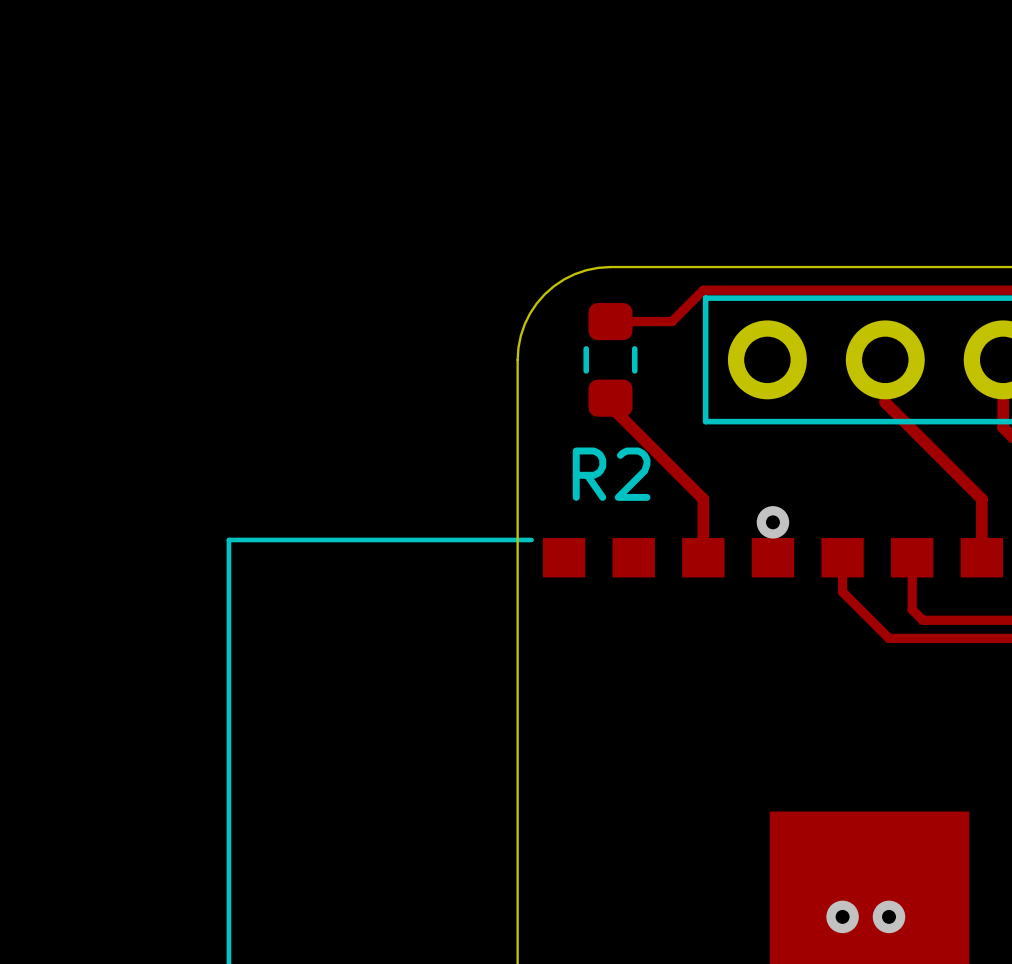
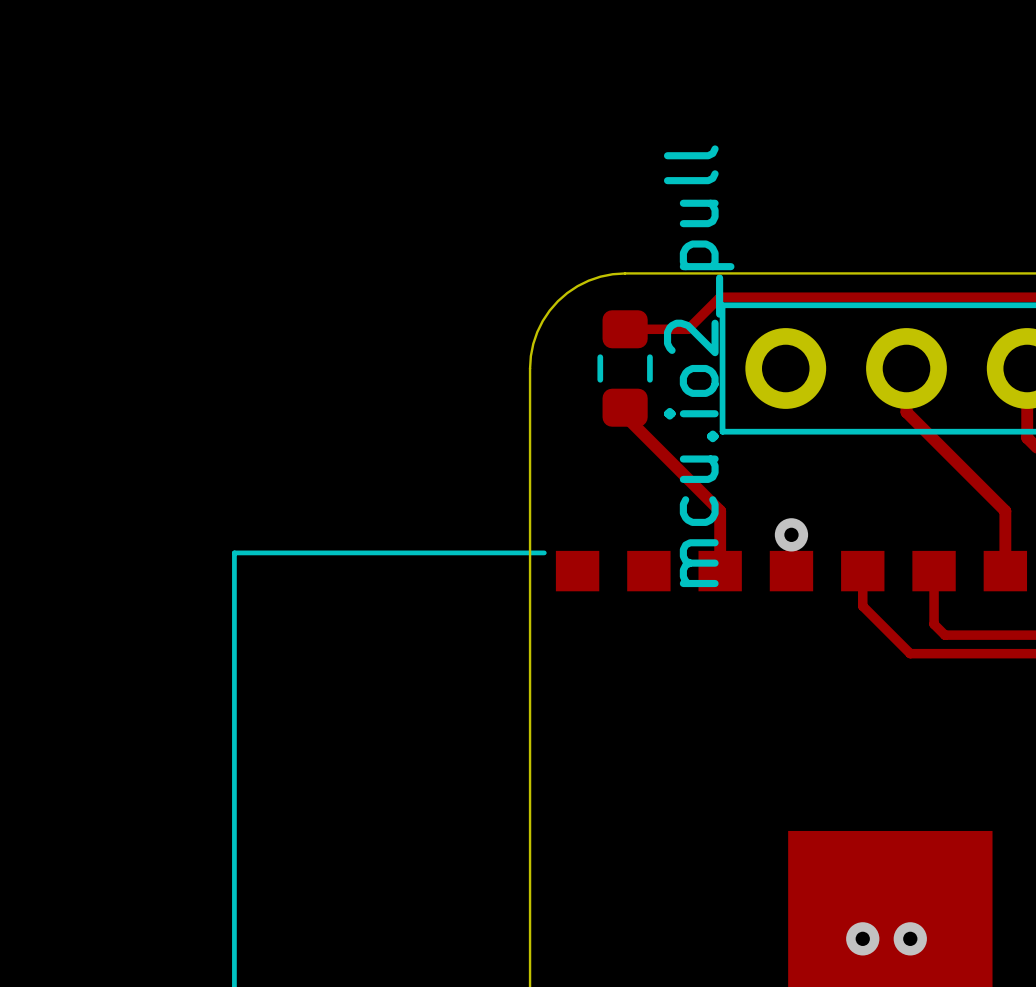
R2 name: R2 (611, 474) -> mcu.io2_pull (699, 366)

